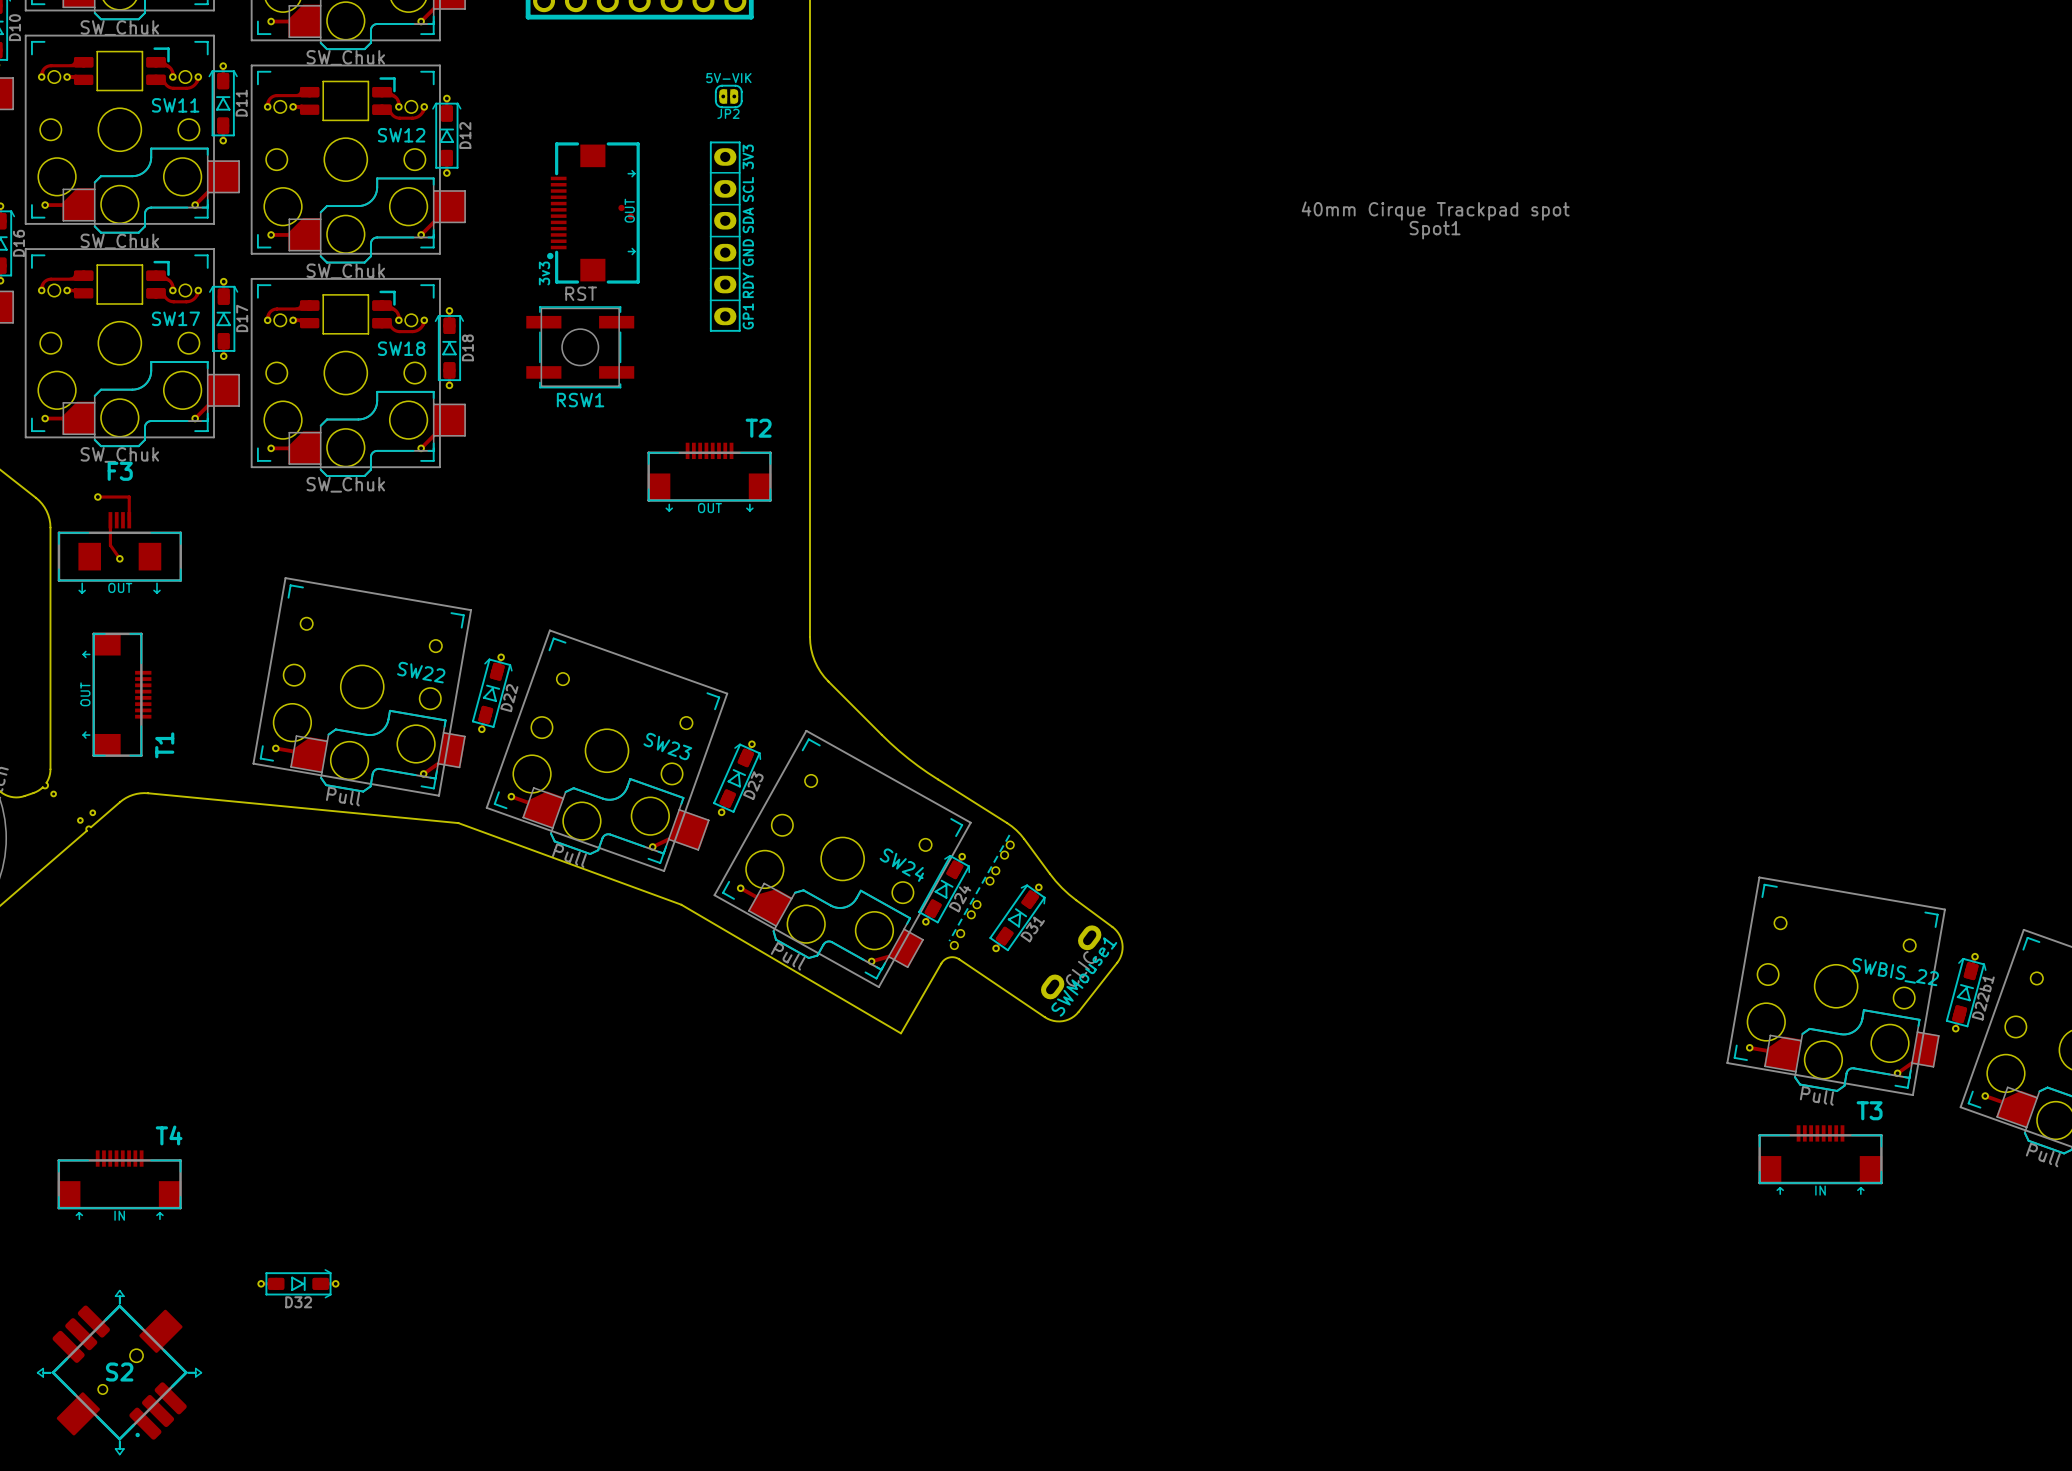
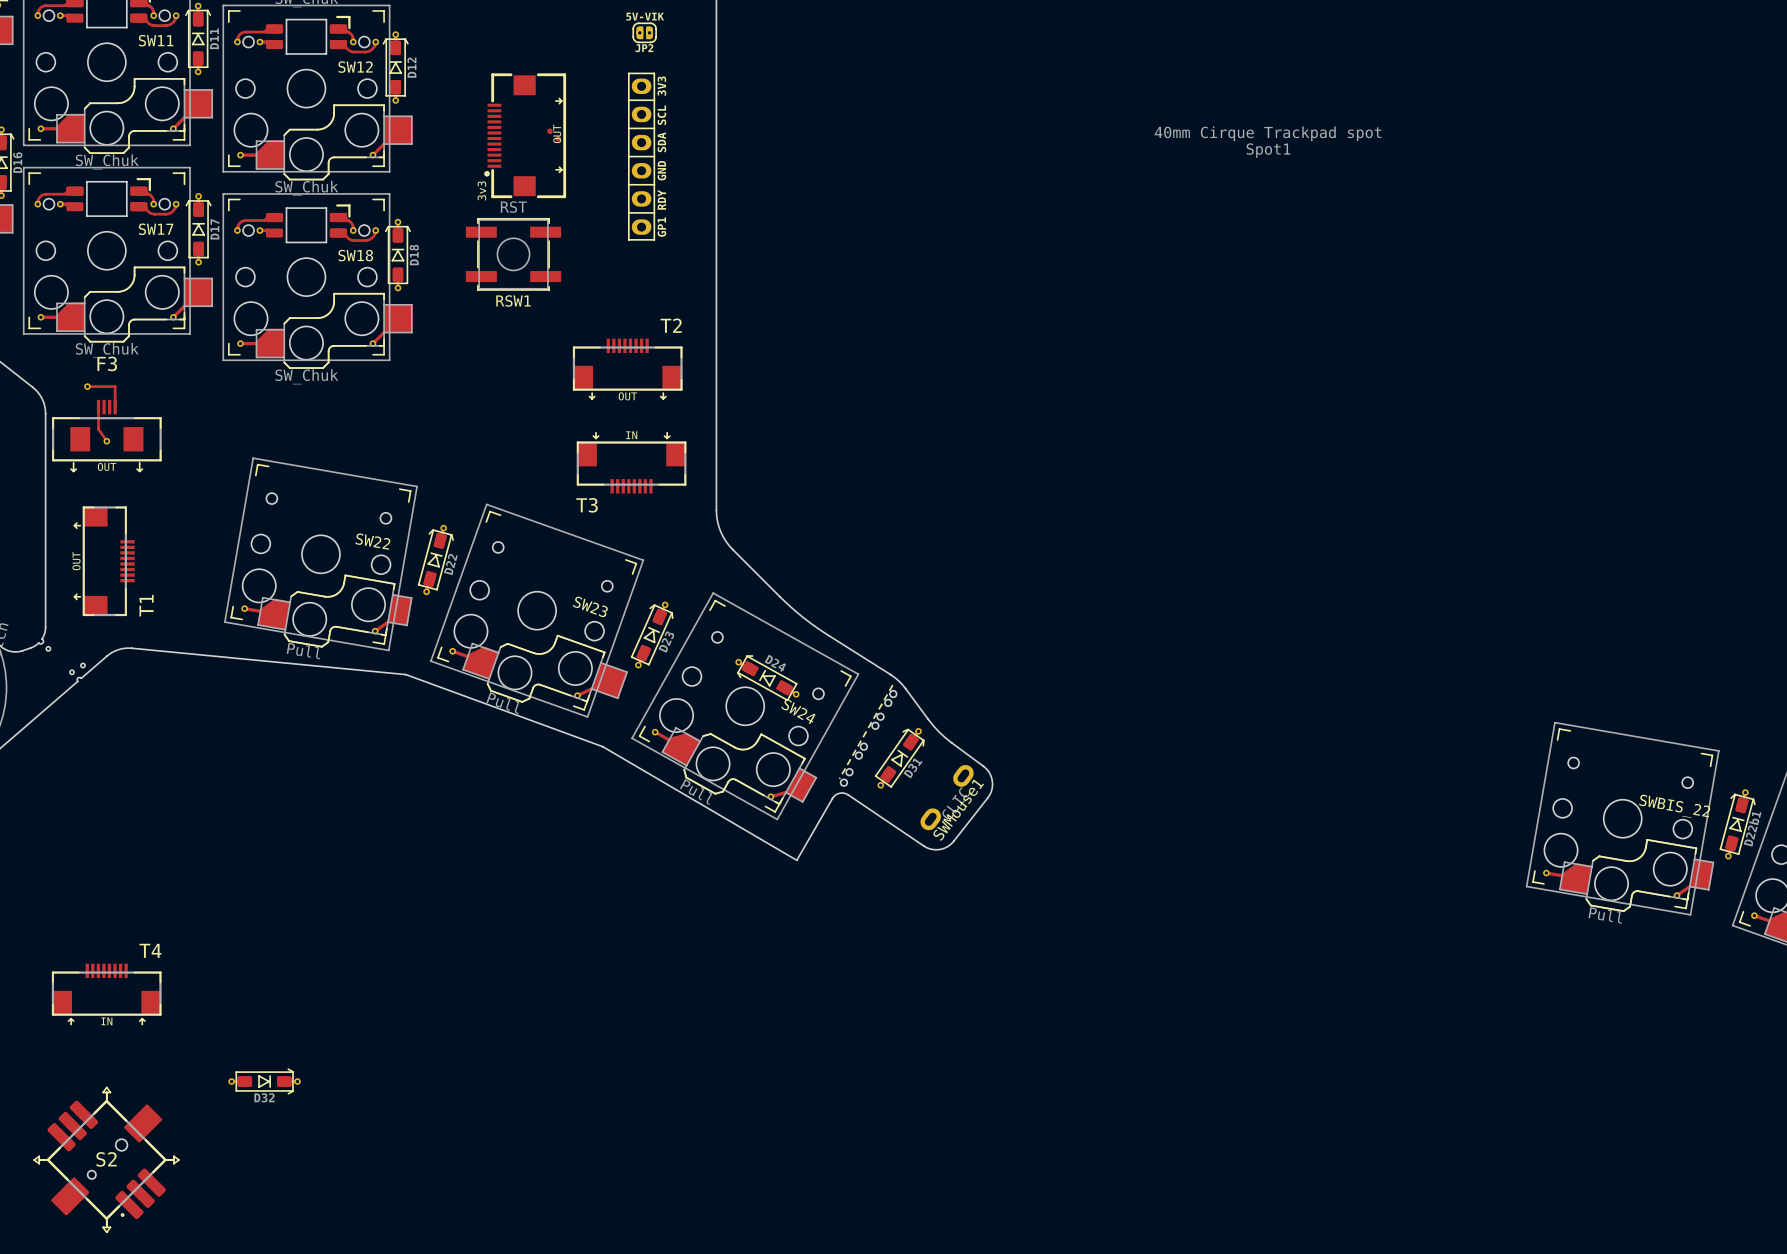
D24 rotation: 0° (944, 889) -> 90° counterclockwise (767, 678)
D24 position: (944, 889) -> (767, 678)
T3 rotation: 0° (1820, 1160) -> 180° (631, 462)
T3 position: (1820, 1160) -> (631, 462)

